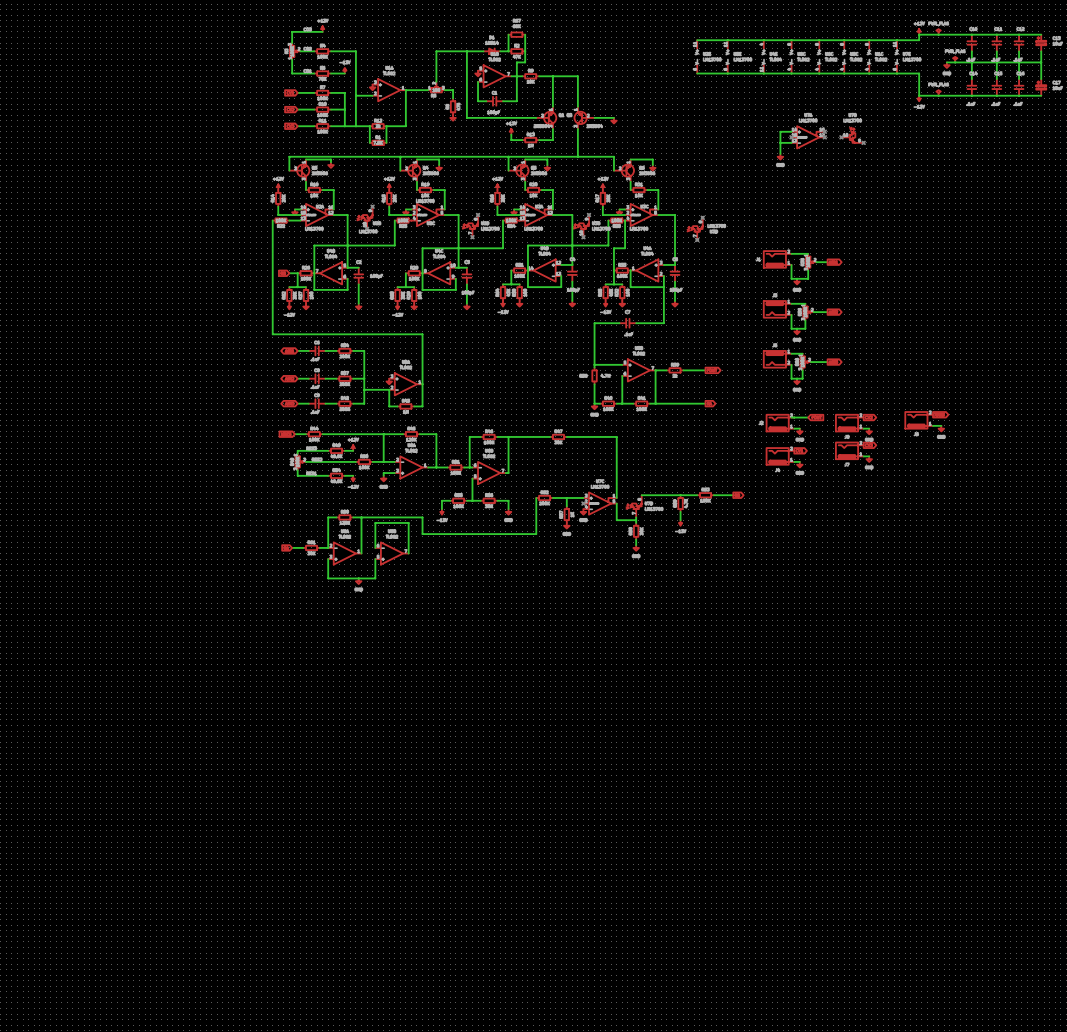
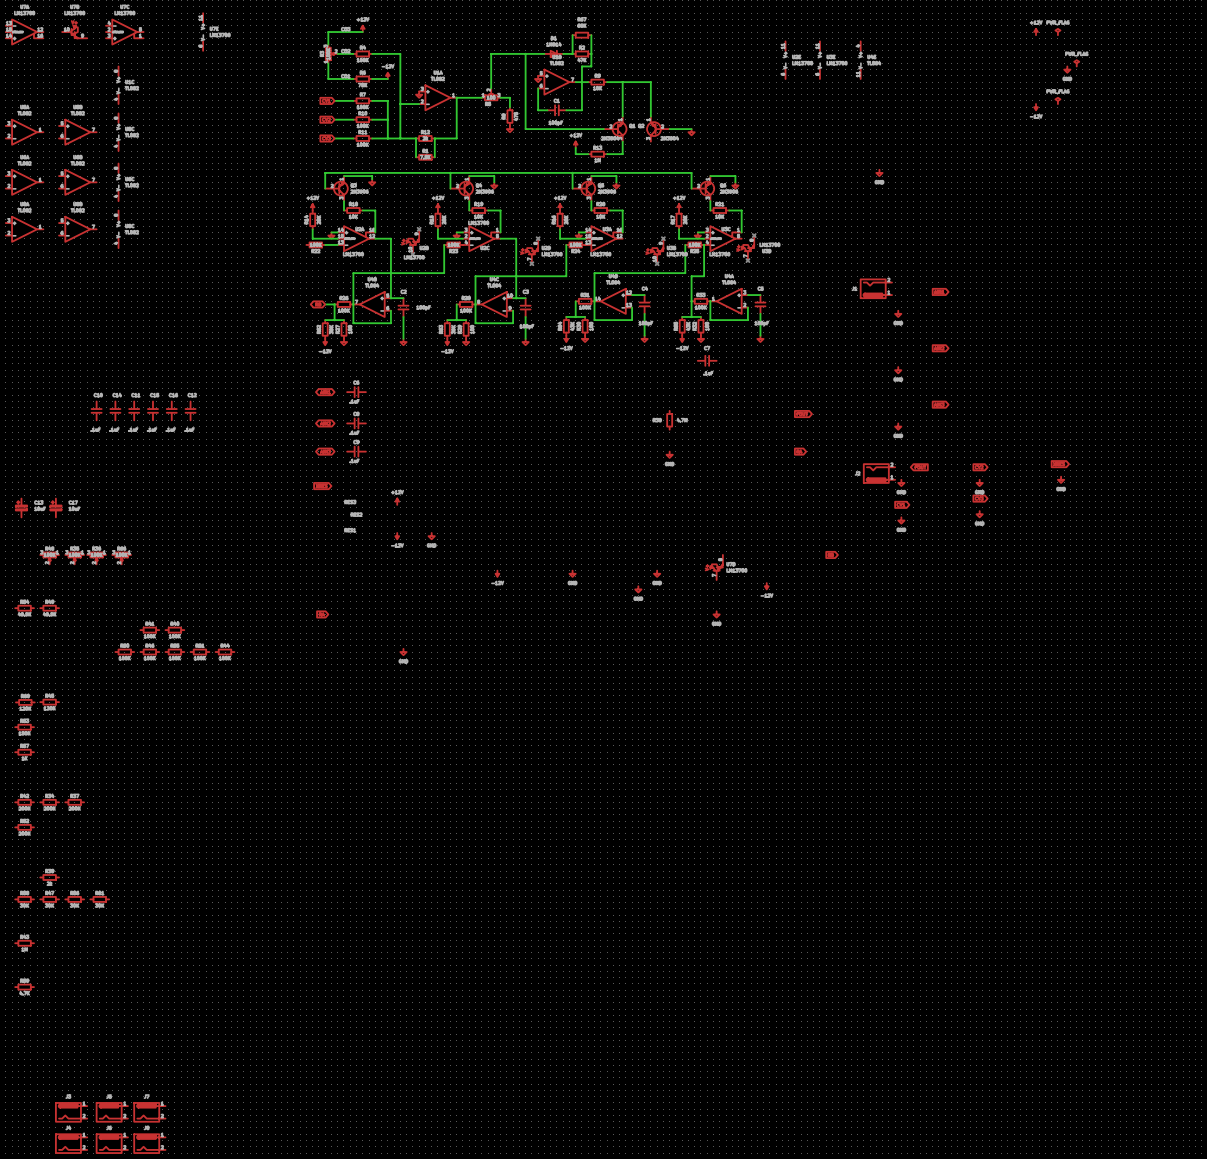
wire: (1041, 34) (919, 34) (919, 40) (697, 40) -> none
part position: (971, 43) -> (96, 410)
part position: (996, 43) -> (134, 410)
part position: (1019, 43) -> (190, 410)
part position: (1041, 43) -> (21, 507)
wire: (971, 51) (971, 79) -> none
wire: (996, 51) (996, 79) -> none
wire: (1019, 51) (1019, 79) -> none
wire: (1041, 51) (1041, 79) -> none
part position: (791, 56) -> (118, 229)
part position: (819, 56) -> (118, 182)
part position: (844, 56) -> (118, 132)
part position: (869, 56) -> (118, 85)
part position: (896, 56) -> (203, 32)
wire: (946, 62) (1041, 62) -> none
wire: (697, 73) (919, 73) (919, 95) (1041, 95) -> none
part position: (971, 87) -> (115, 410)
part position: (996, 87) -> (152, 410)
part position: (1019, 87) -> (171, 410)
part position: (1041, 87) -> (55, 507)
wire: (577, 129) (577, 156) -> none
wire: (791, 131) (780, 131) (780, 153) -> none
no-connect mark: (824, 131) -> none
no-connect mark: (791, 137) -> none
part flip: as is (808, 137) -> up-down (24, 32)
part position: (808, 137) -> (24, 32)
no-connect mark: (824, 137) -> none
no-connect mark: (841, 137) -> none
part position: (852, 137) -> (74, 32)
wire: (780, 142) (791, 142) -> none
no-connect mark: (863, 142) -> none
no-connect mark: none -> (754, 235)
wire: (552, 215) (572, 215) (572, 264) -> none
wire: (658, 215) (675, 215) (675, 264) -> none
no-connect mark: (702, 217) -> none
wire: (272, 220) (272, 334) (422, 334) (422, 406) (414, 406) -> none
part position: (697, 228) -> (747, 248)
no-connect mark: none -> (747, 260)
no-connect mark: (697, 239) -> none
wire: (791, 253) (808, 253) -> none
part rotation: 0° (809, 262) -> 90° clockwise (74, 556)
part position: (811, 262) -> (74, 558)
wire: (816, 262) (827, 262) -> none
wire: (791, 264) (791, 278) (808, 278) (808, 270) -> none
global label shape: input (283, 273) -> bidirectional (318, 304)
wire: (663, 287) (663, 323) (636, 323) -> none
wire: (791, 303) (805, 303) -> none
part position: (777, 309) -> (71, 1112)
part rotation: 0° (806, 312) -> 90° clockwise (96, 556)
part position: (808, 312) -> (96, 558)
wire: (813, 312) (827, 312) -> none
wire: (791, 314) (791, 328) (805, 328) (805, 320) -> none
wire: (619, 323) (594, 323) (594, 367) -> none
wire: (297, 350) (308, 350) -> none
wire: (325, 350) (336, 350) -> none
part position: (344, 350) -> (49, 802)
wire: (353, 350) (364, 350) (364, 403) (353, 403) -> none
wire: (791, 353) (802, 353) -> none
part position: (777, 359) -> (112, 1112)
part rotation: 0° (804, 362) -> 90° clockwise (121, 556)
part position: (805, 362) -> (121, 558)
wire: (810, 362) (827, 362) -> none
wire: (594, 364) (622, 364) -> none
wire: (791, 364) (791, 378) (802, 378) (802, 370) -> none
part position: (638, 370) -> (77, 132)
wire: (666, 370) (655, 370) (655, 403) -> none
part position: (675, 370) -> (49, 877)
wire: (683, 370) (705, 370) -> none
wire: (622, 375) (622, 403) -> none
wire: (297, 378) (308, 378) -> none
wire: (325, 378) (336, 378) -> none
part position: (344, 378) -> (74, 802)
wire: (353, 378) (364, 378) -> none
power symbol: (389, 381) -> none
part position: (405, 384) -> (24, 132)
wire: (594, 384) (594, 403) (600, 403) -> none
wire: (364, 389) (389, 389) (389, 406) (397, 406) -> none
wire: (297, 403) (308, 403) -> none
wire: (325, 403) (336, 403) -> none
part position: (344, 403) -> (24, 802)
part position: (608, 403) -> (174, 630)
wire: (616, 403) (633, 403) -> none
part position: (641, 403) -> (149, 630)
wire: (650, 403) (705, 403) -> none
part position: (405, 406) -> (24, 943)
wire: (791, 417) (808, 417) -> none
part flip: as is (916, 420) -> up-down (109, 1143)
part position: (919, 420) -> (112, 1143)
part flip: as is (847, 423) -> up-down (146, 1143)
part position: (849, 423) -> (149, 1143)
wire: (933, 425) (941, 425) -> none
wire: (794, 428) (799, 428) -> none
wire: (863, 428) (869, 428) -> none
wire: (294, 434) (306, 434) -> none
part position: (314, 434) -> (225, 652)
wire: (322, 434) (403, 434) -> none
wire: (383, 434) (383, 461) -> none
part position: (411, 434) -> (49, 702)
wire: (419, 434) (436, 434) (436, 467) -> none
wire: (480, 436) (469, 436) (469, 467) -> none
part position: (489, 436) -> (149, 652)
wire: (497, 436) (550, 436) -> none
wire: (508, 436) (508, 473) (505, 473) -> none
part position: (558, 436) -> (49, 899)
wire: (566, 436) (616, 436) (616, 498) -> none
wire: (328, 450) (297, 450) (297, 453) -> none
part position: (336, 450) -> (49, 608)
wire: (344, 450) (353, 450) -> none
part flip: as is (847, 450) -> up-down (146, 1112)
part position: (849, 450) -> (149, 1112)
part flip: as is (777, 456) -> up-down (68, 1143)
part position: (780, 456) -> (71, 1143)
wire: (863, 456) (869, 456) -> none
part rotation: 0° (299, 461) -> 90° clockwise (49, 556)
part position: (300, 461) -> (49, 558)
wire: (306, 461) (355, 461) -> none
part position: (364, 461) -> (124, 652)
wire: (372, 461) (394, 461) -> none
wire: (794, 461) (799, 461) -> none
part flip: as is (411, 467) -> up-down (24, 182)
part position: (411, 467) -> (24, 182)
wire: (428, 467) (447, 467) -> none
part position: (455, 467) -> (199, 652)
wire: (464, 467) (472, 467) -> none
wire: (297, 470) (297, 475) (328, 475) -> none
wire: (394, 473) (383, 473) (383, 475) -> none
part flip: as is (489, 473) -> up-down (77, 182)
part position: (489, 473) -> (77, 182)
part position: (336, 475) -> (24, 608)
wire: (344, 475) (353, 475) -> none
wire: (472, 478) (472, 500) -> none
wire: (641, 495) (697, 495) -> none
part position: (705, 495) -> (24, 727)
wire: (713, 495) (733, 495) -> none
wire: (536, 498) (536, 534) (422, 534) (422, 517) (353, 517) -> none
part position: (544, 498) -> (24, 827)
wire: (552, 498) (583, 498) -> none
wire: (566, 498) (566, 506) -> none
wire: (450, 500) (441, 500) (441, 509) -> none
part position: (458, 500) -> (174, 652)
wire: (466, 500) (480, 500) -> none
part position: (489, 500) -> (74, 899)
wire: (497, 500) (508, 500) (508, 509) -> none
no-connect mark: (583, 503) -> none
part flip: as is (600, 503) -> up-down (124, 32)
part position: (600, 503) -> (124, 32)
wire: (616, 503) (616, 520) (636, 520) -> none
part rotation: 0° (680, 503) -> 90° clockwise (24, 987)
part position: (680, 503) -> (24, 987)
wire: (680, 511) (680, 520) -> none
part rotation: 0° (566, 514) -> 90° clockwise (24, 752)
part position: (566, 514) -> (24, 752)
wire: (336, 517) (328, 517) (328, 547) (319, 547) -> none
part position: (344, 517) -> (25, 702)
wire: (361, 517) (361, 553) -> none
wire: (636, 517) (636, 522) -> none
part rotation: 0° (636, 531) -> 90° clockwise (24, 899)
part position: (636, 531) -> (24, 899)
wire: (636, 539) (636, 545) -> none
wire: (292, 547) (303, 547) -> none
part position: (311, 547) -> (99, 899)
wire: (375, 547) (375, 522) (408, 522) (408, 553) -> none
part flip: as is (344, 553) -> up-down (24, 229)
part position: (344, 553) -> (24, 229)
part flip: as is (392, 553) -> up-down (77, 229)
part position: (392, 553) -> (77, 229)
wire: (328, 559) (328, 578) (375, 578) (375, 559) -> none

